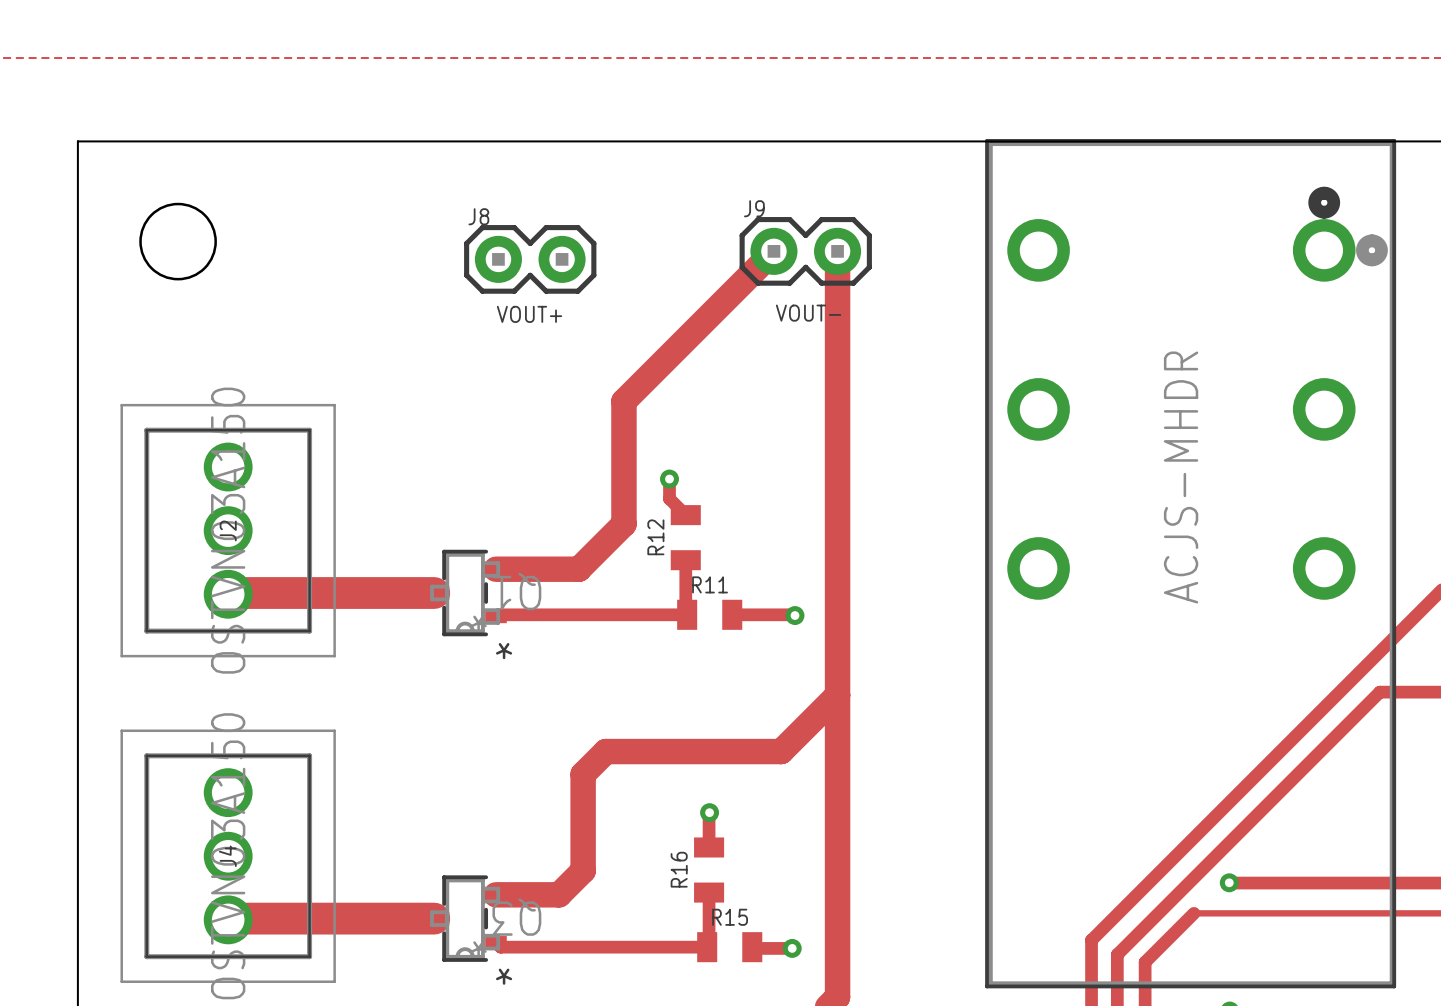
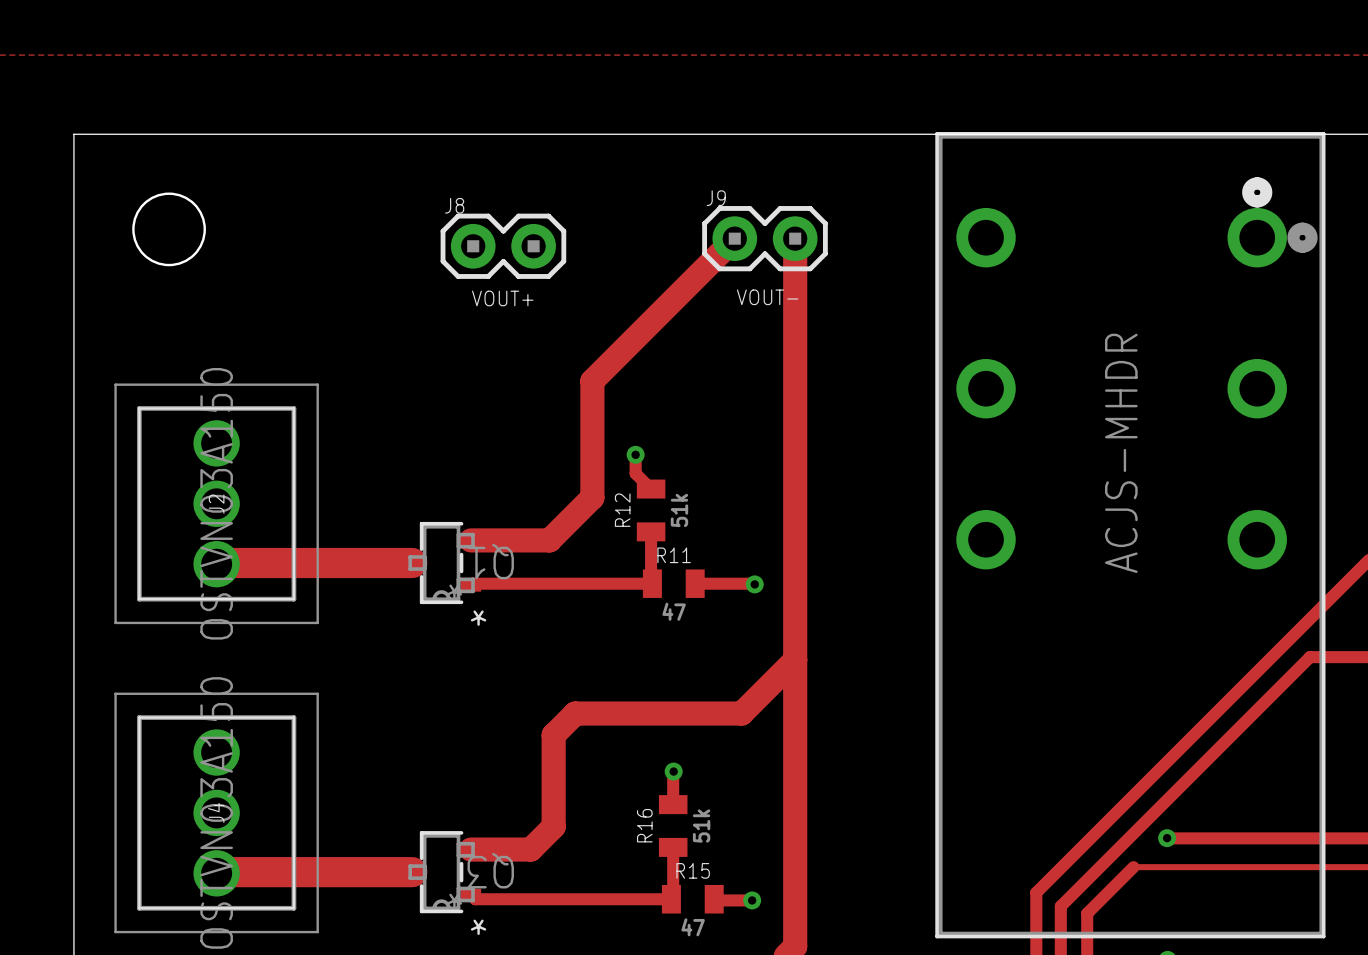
R12 value: none -> 51k (679, 510)
R11 value: none -> 47 (674, 611)
R16 value: none -> 51k (701, 826)
R15 value: none -> 47 (693, 927)

